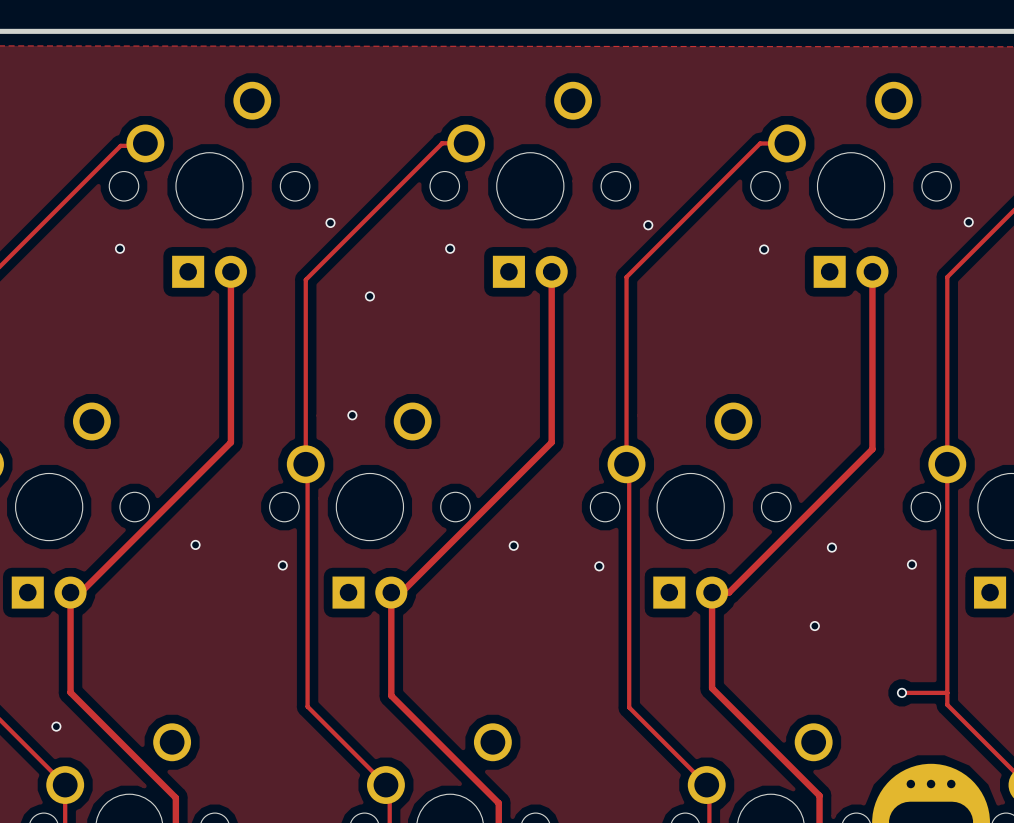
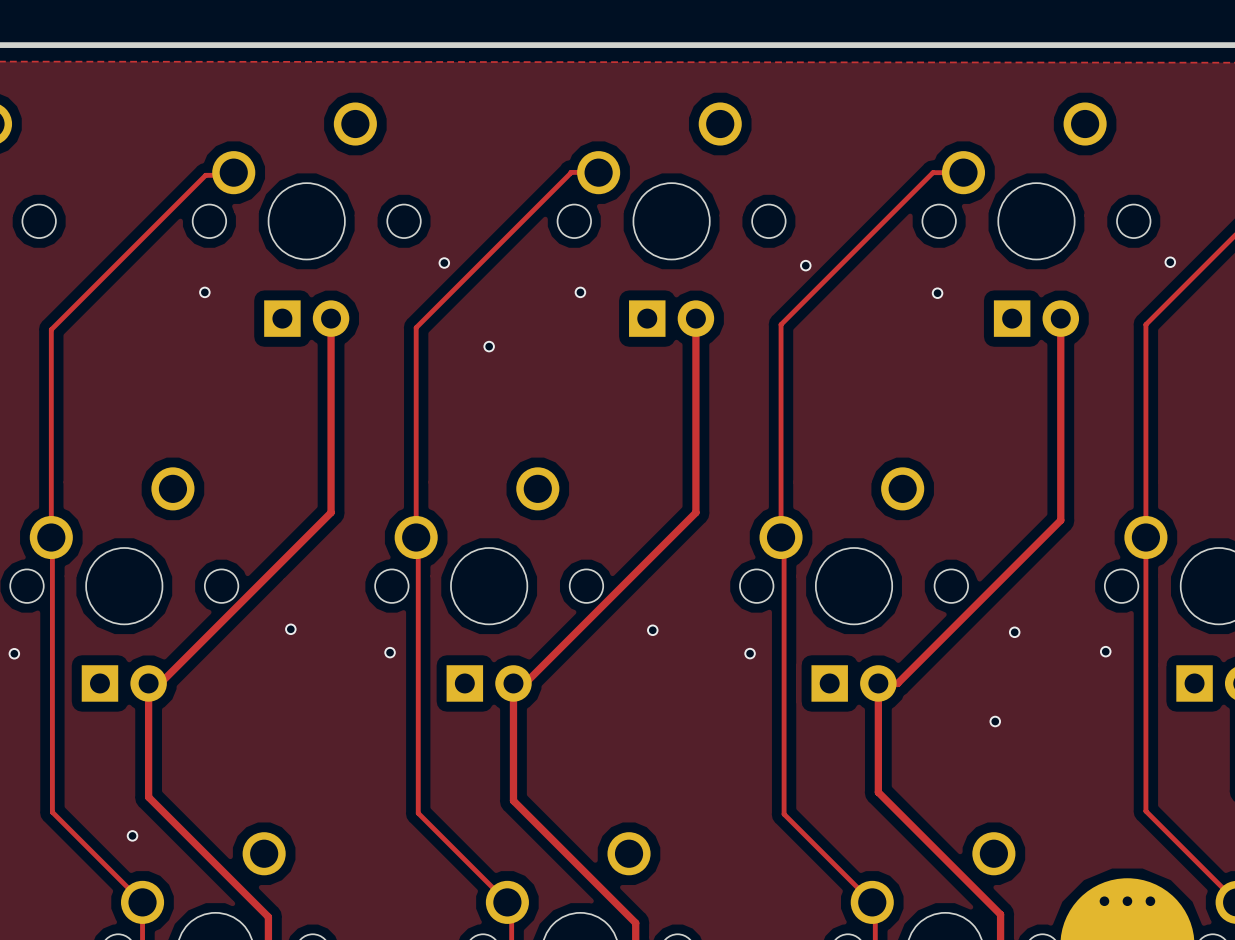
via: (352, 415) -> none
track: (901, 692) (947, 692) -> none
via: (901, 692) -> none

